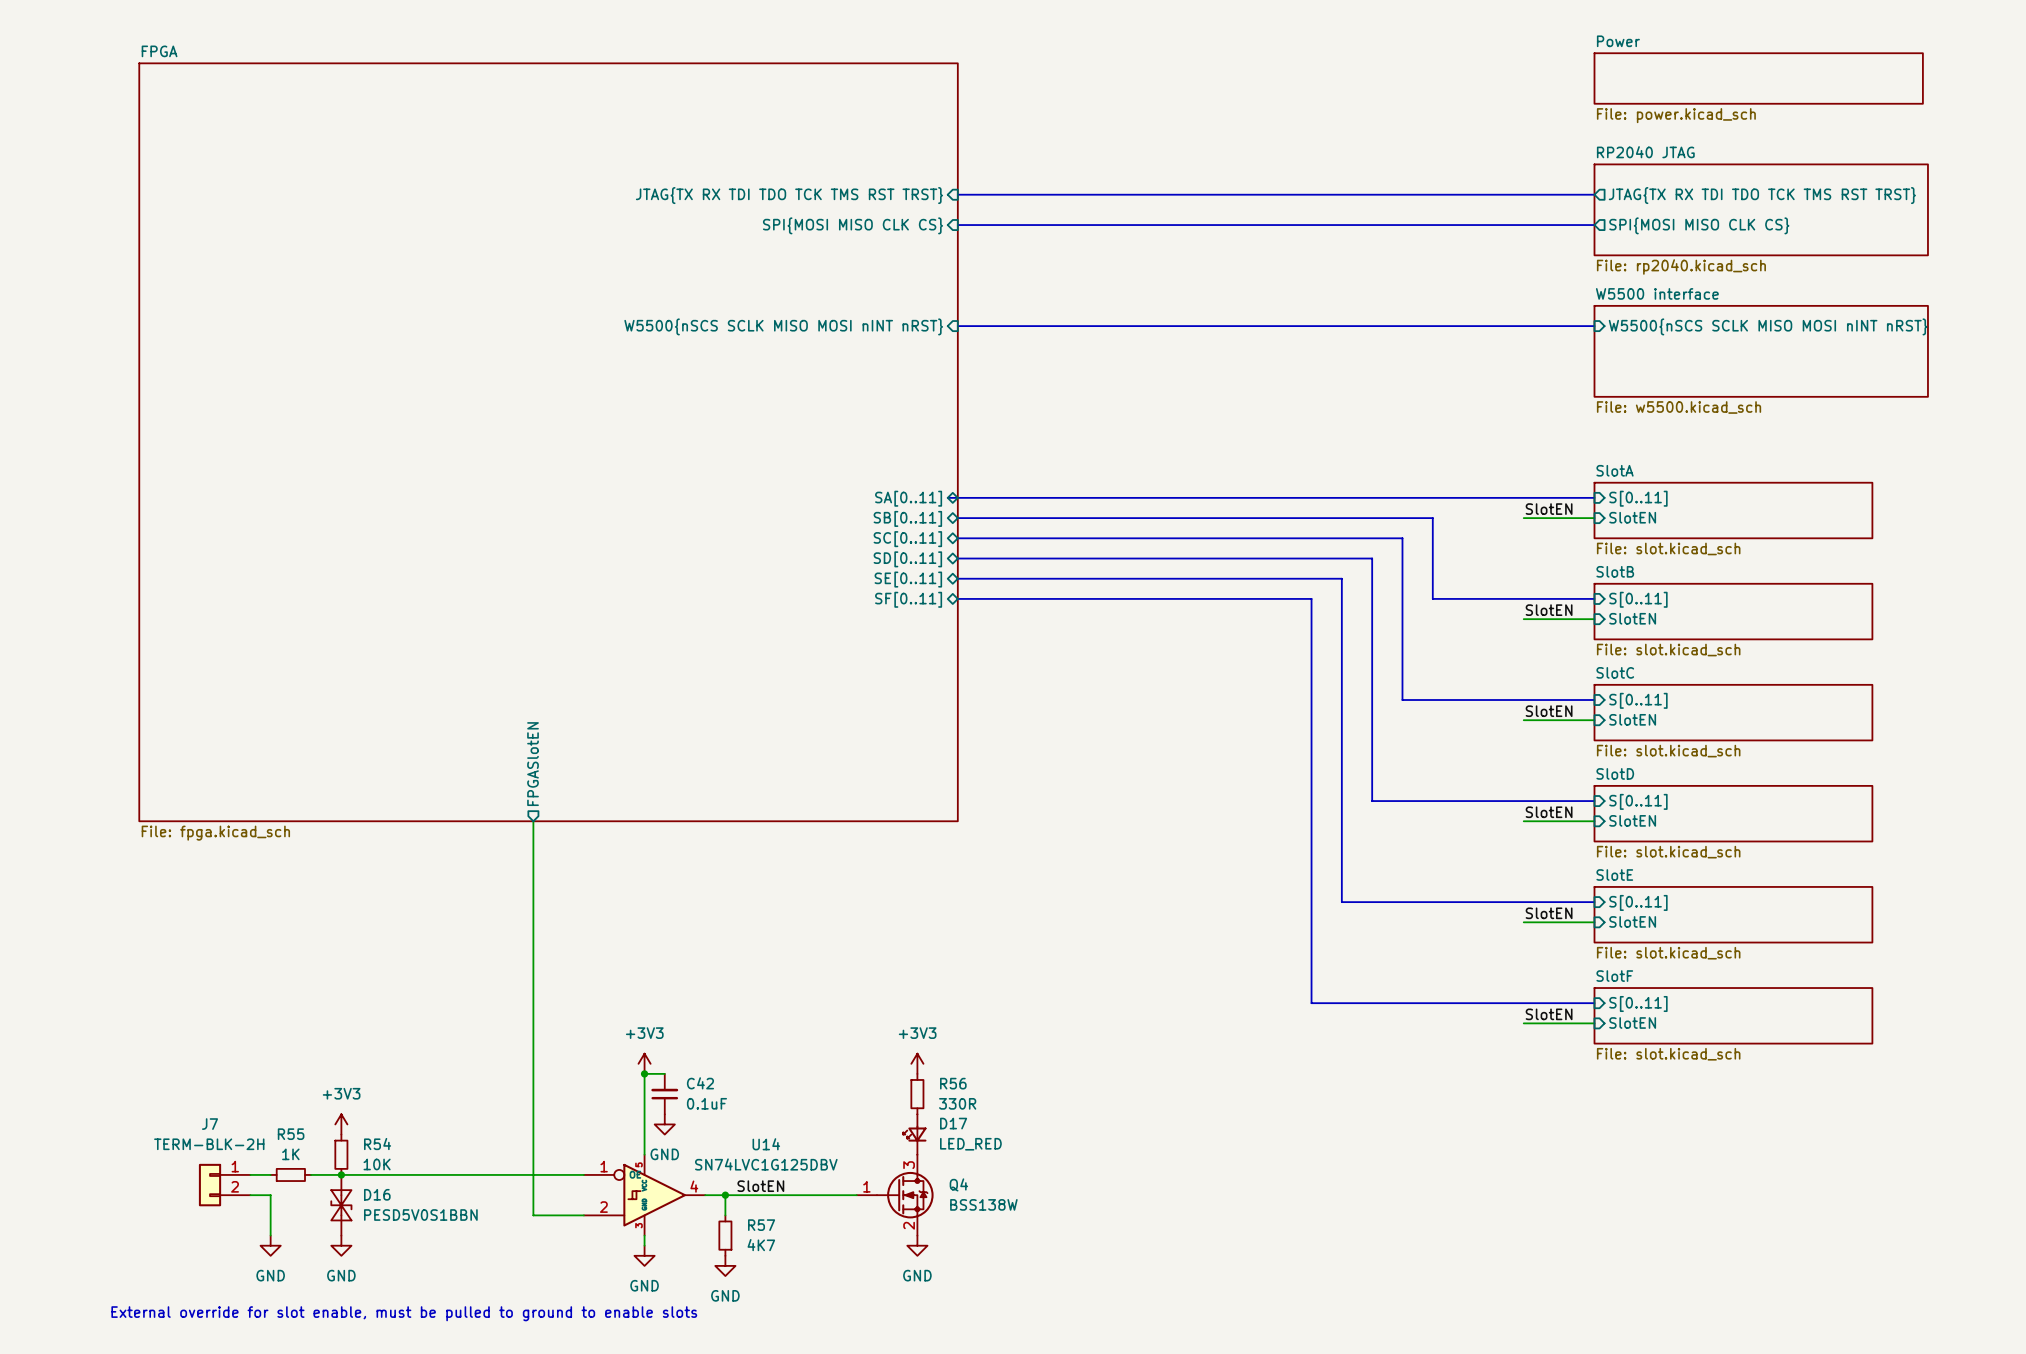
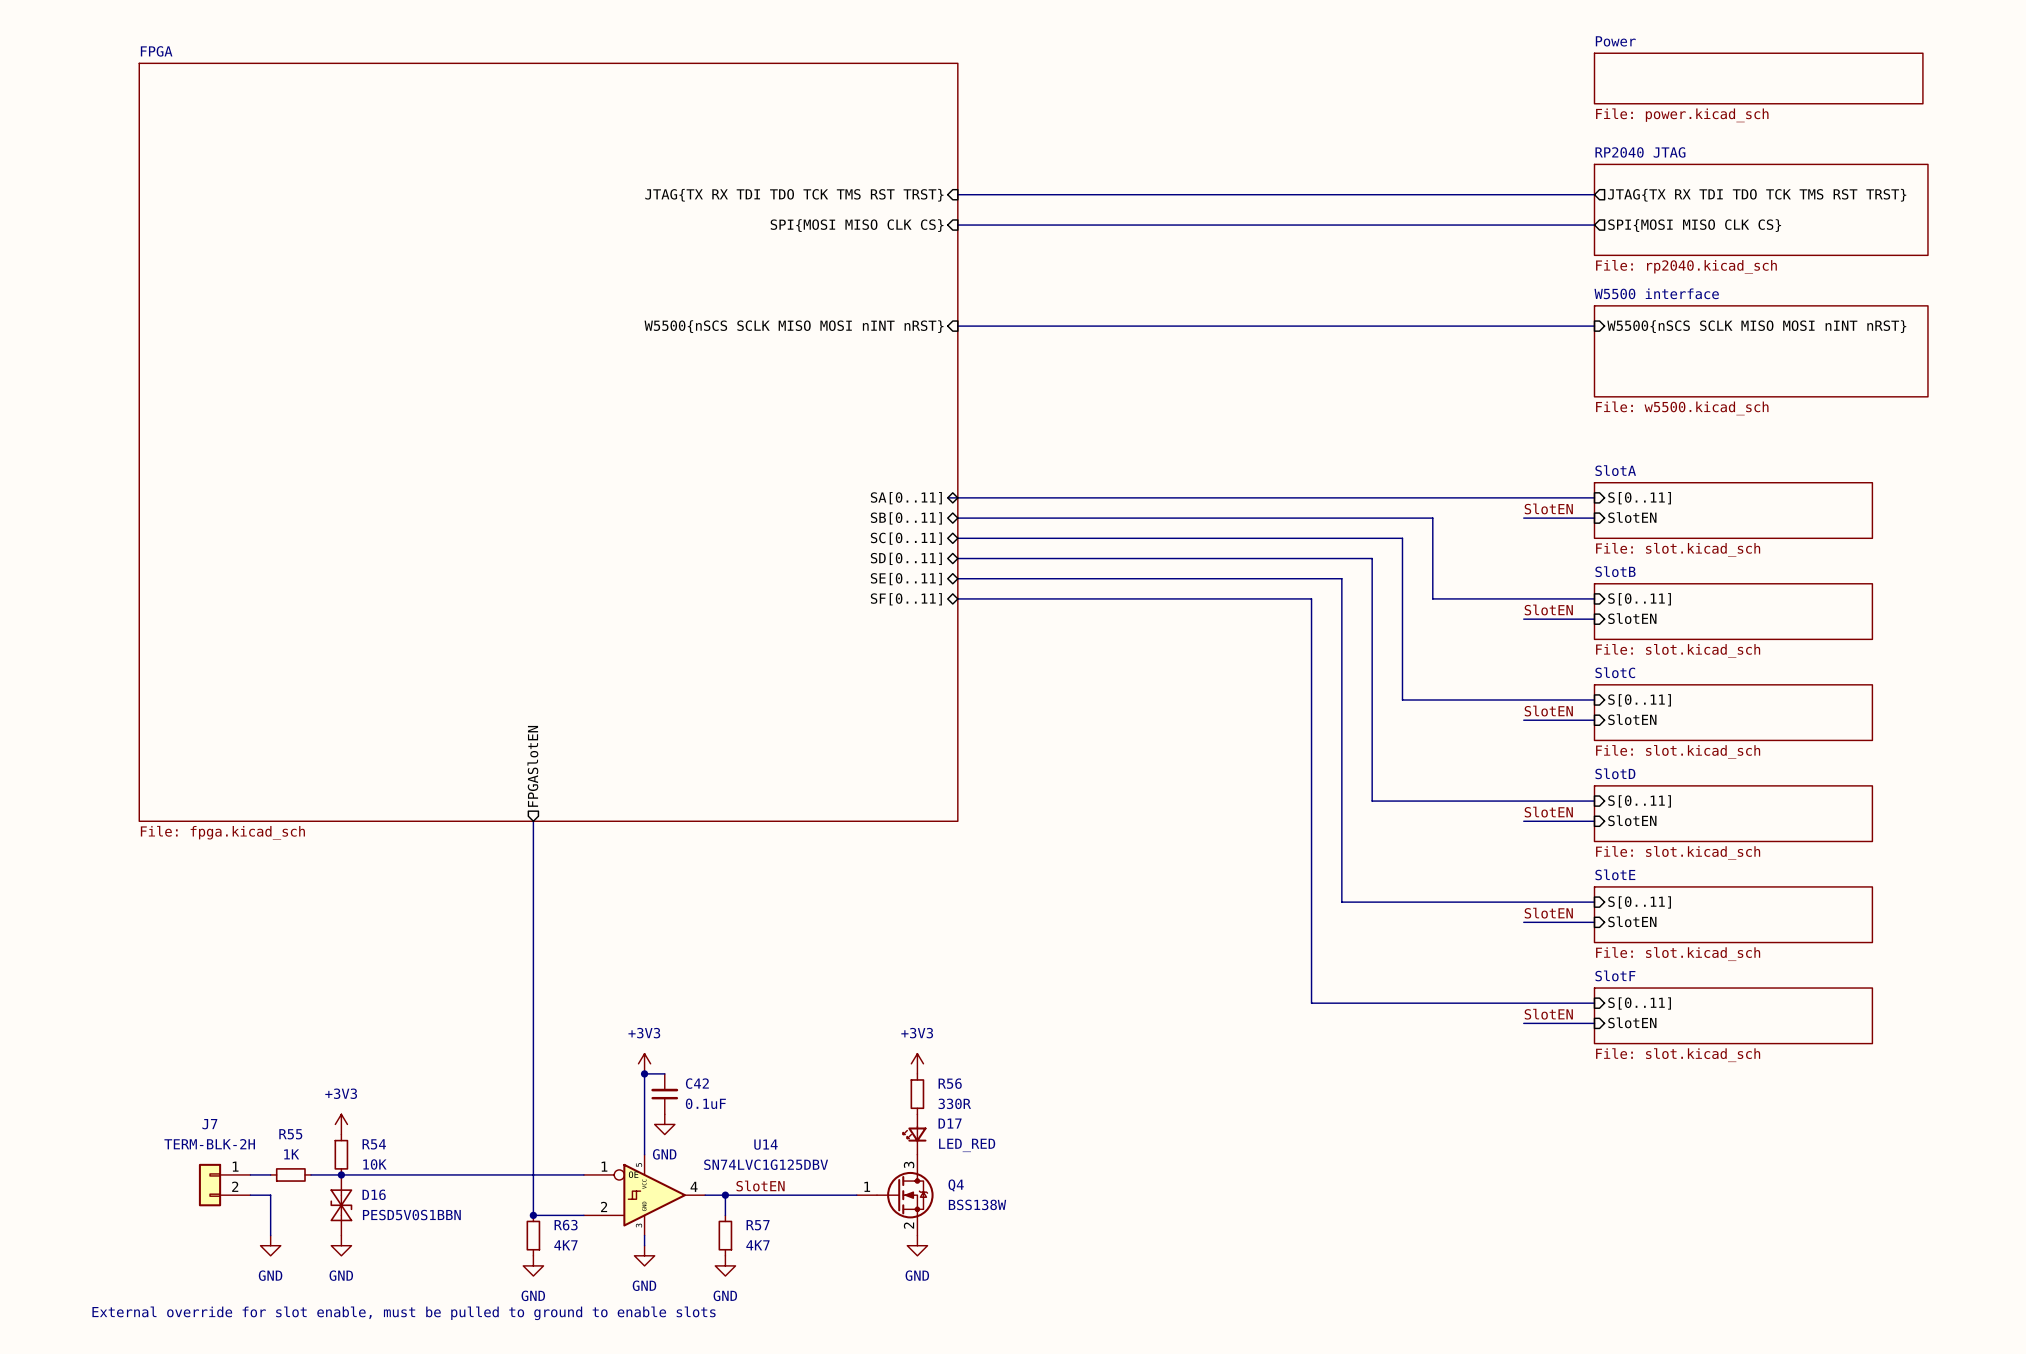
junction: none -> (533, 1215)
R63: none -> 4K7 (533, 1235)
power symbol: none -> GND (533, 1265)

